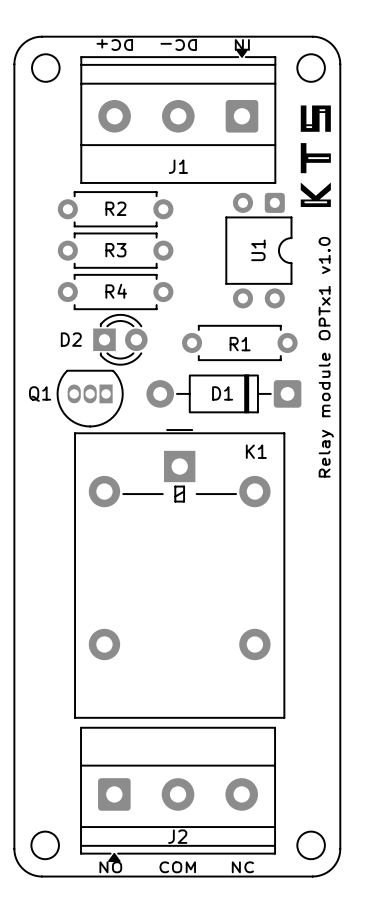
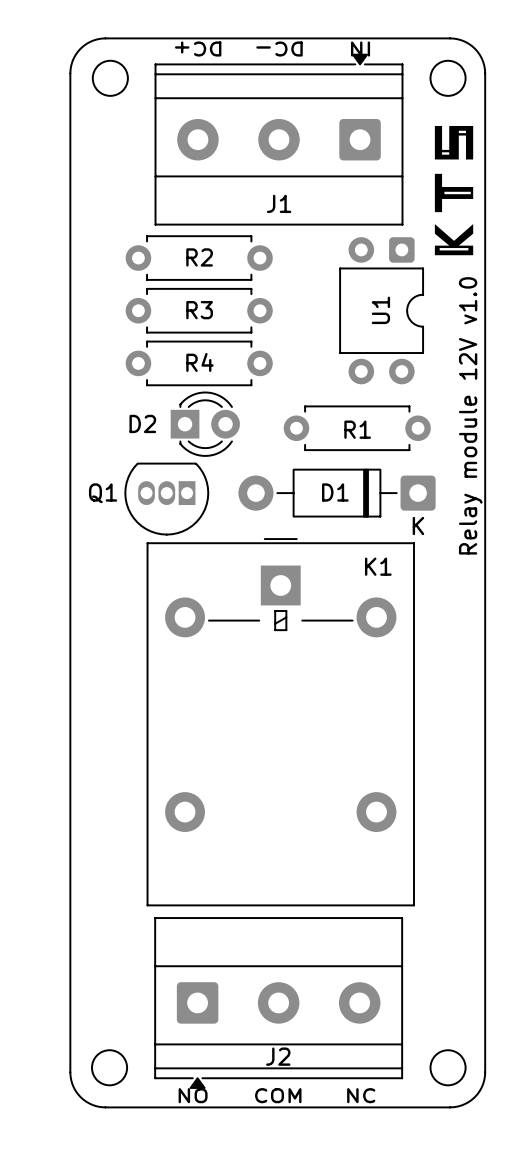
text: Relay module OPTx1 v1.0 (326, 357) -> Relay module 12V v1.0 (470, 415)
D1 text: none -> K (418, 526)

